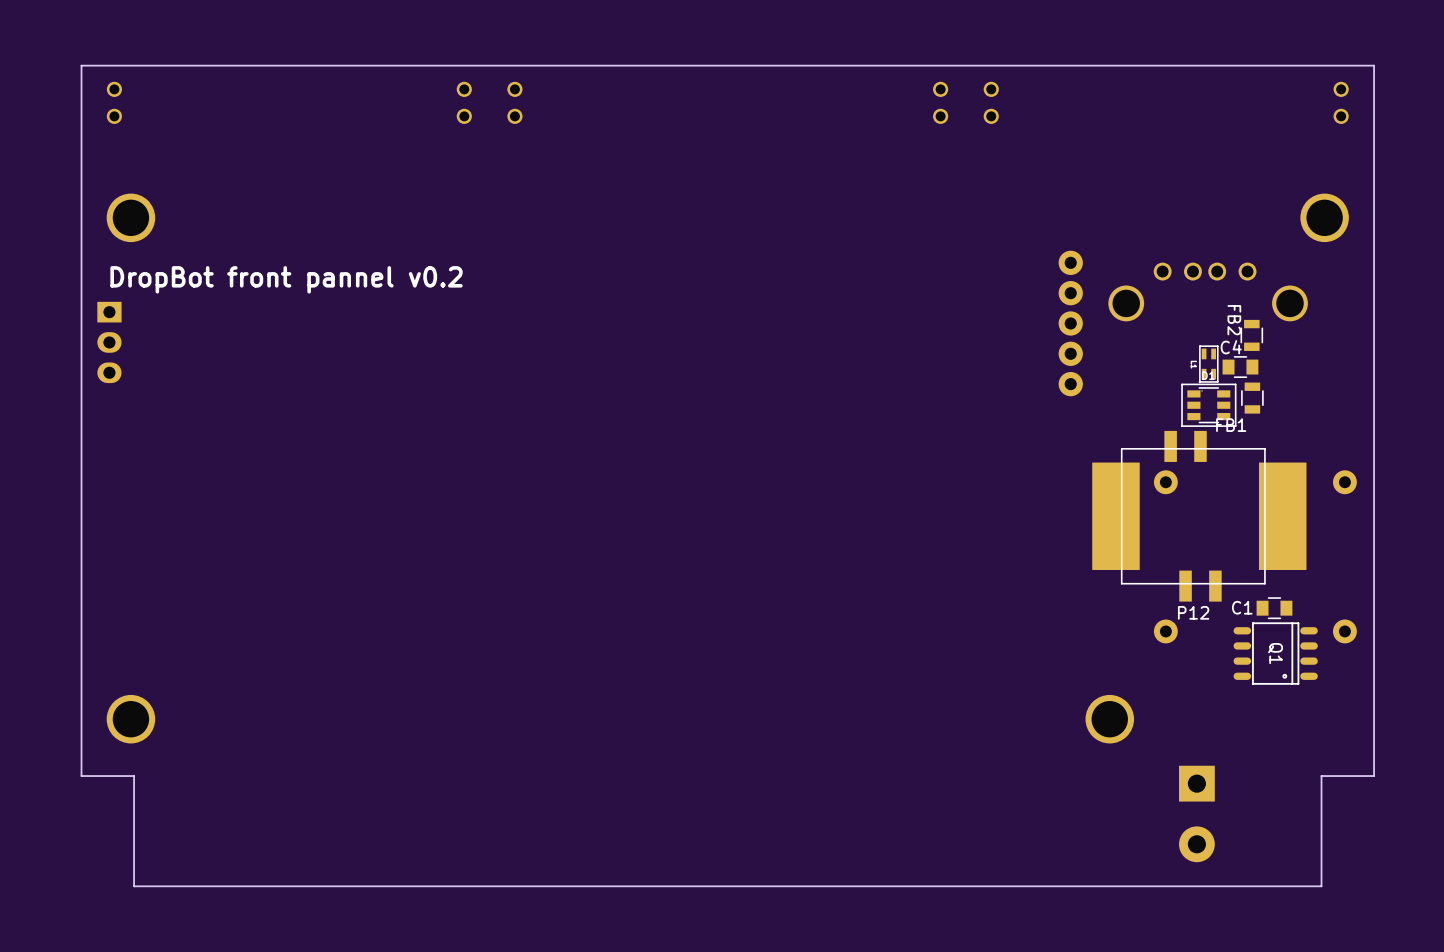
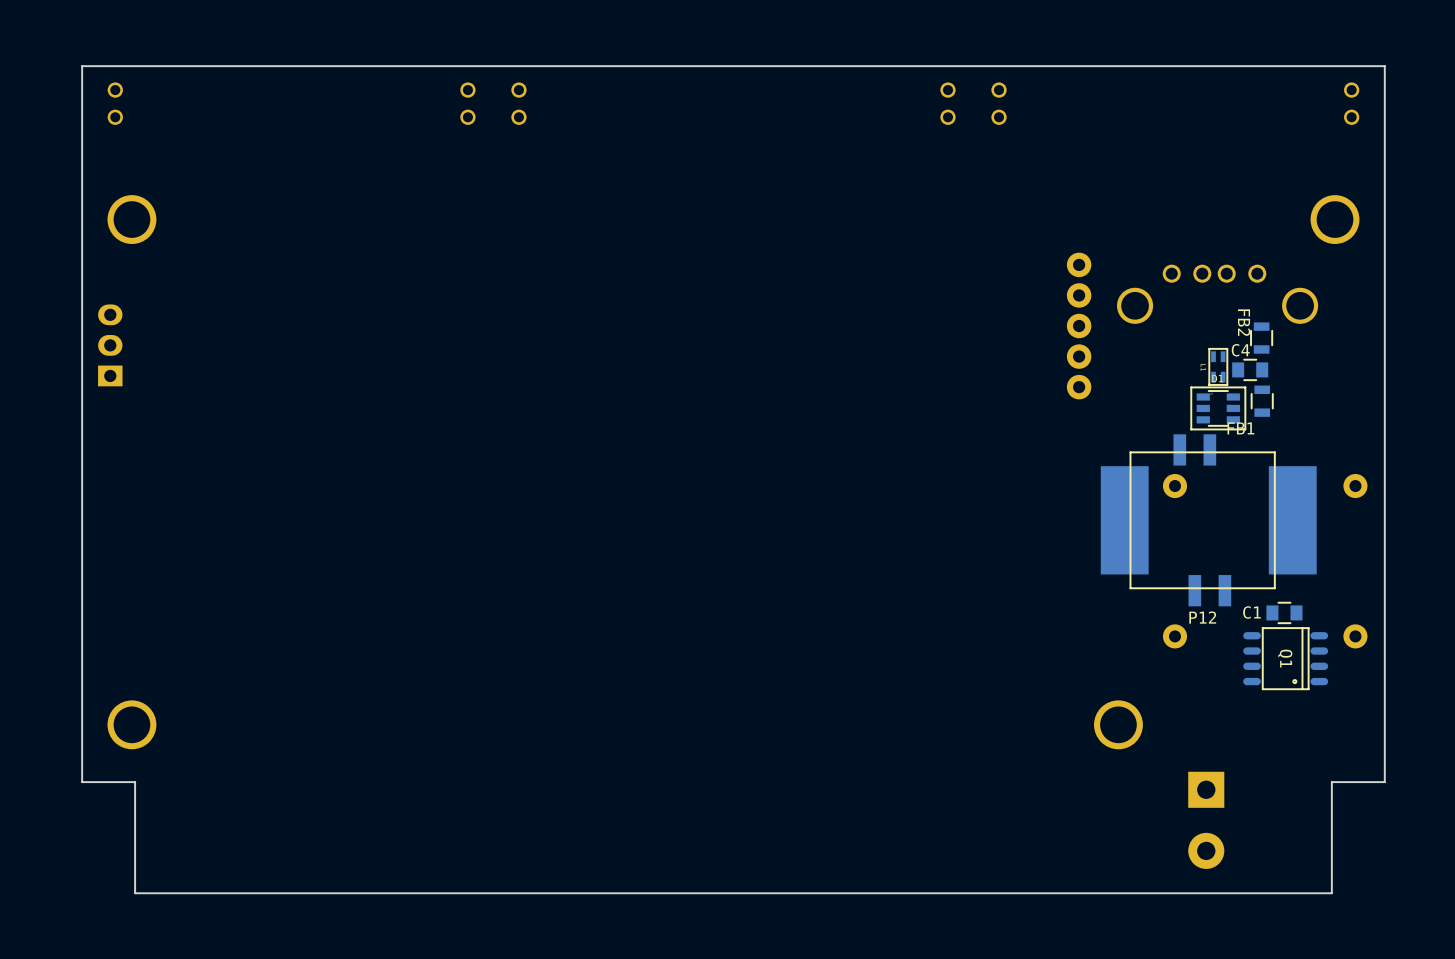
text: DropBot front pannel v0.2 (286, 279) -> none
part rotation: 0° (109, 342) -> 180° (110, 345)

